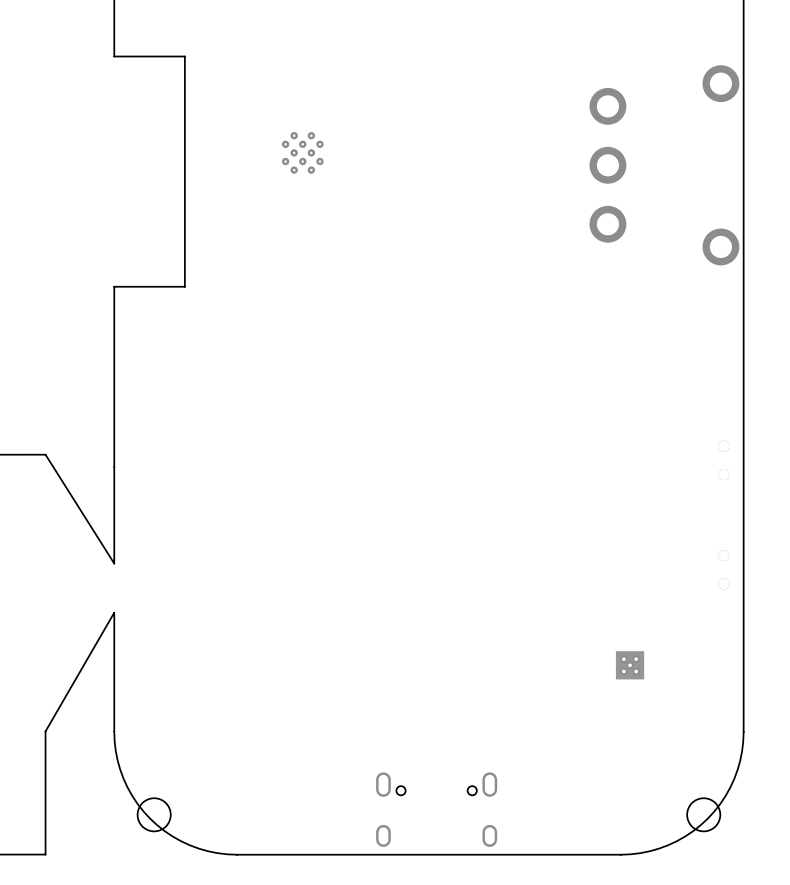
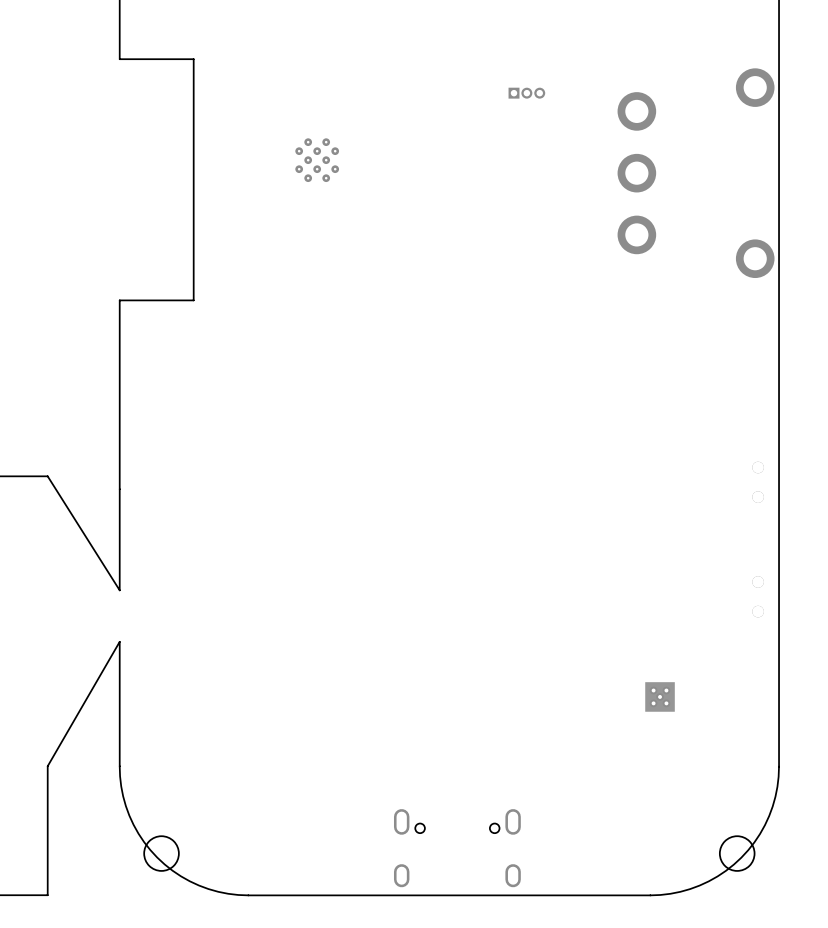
part: none -> (526, 93)

